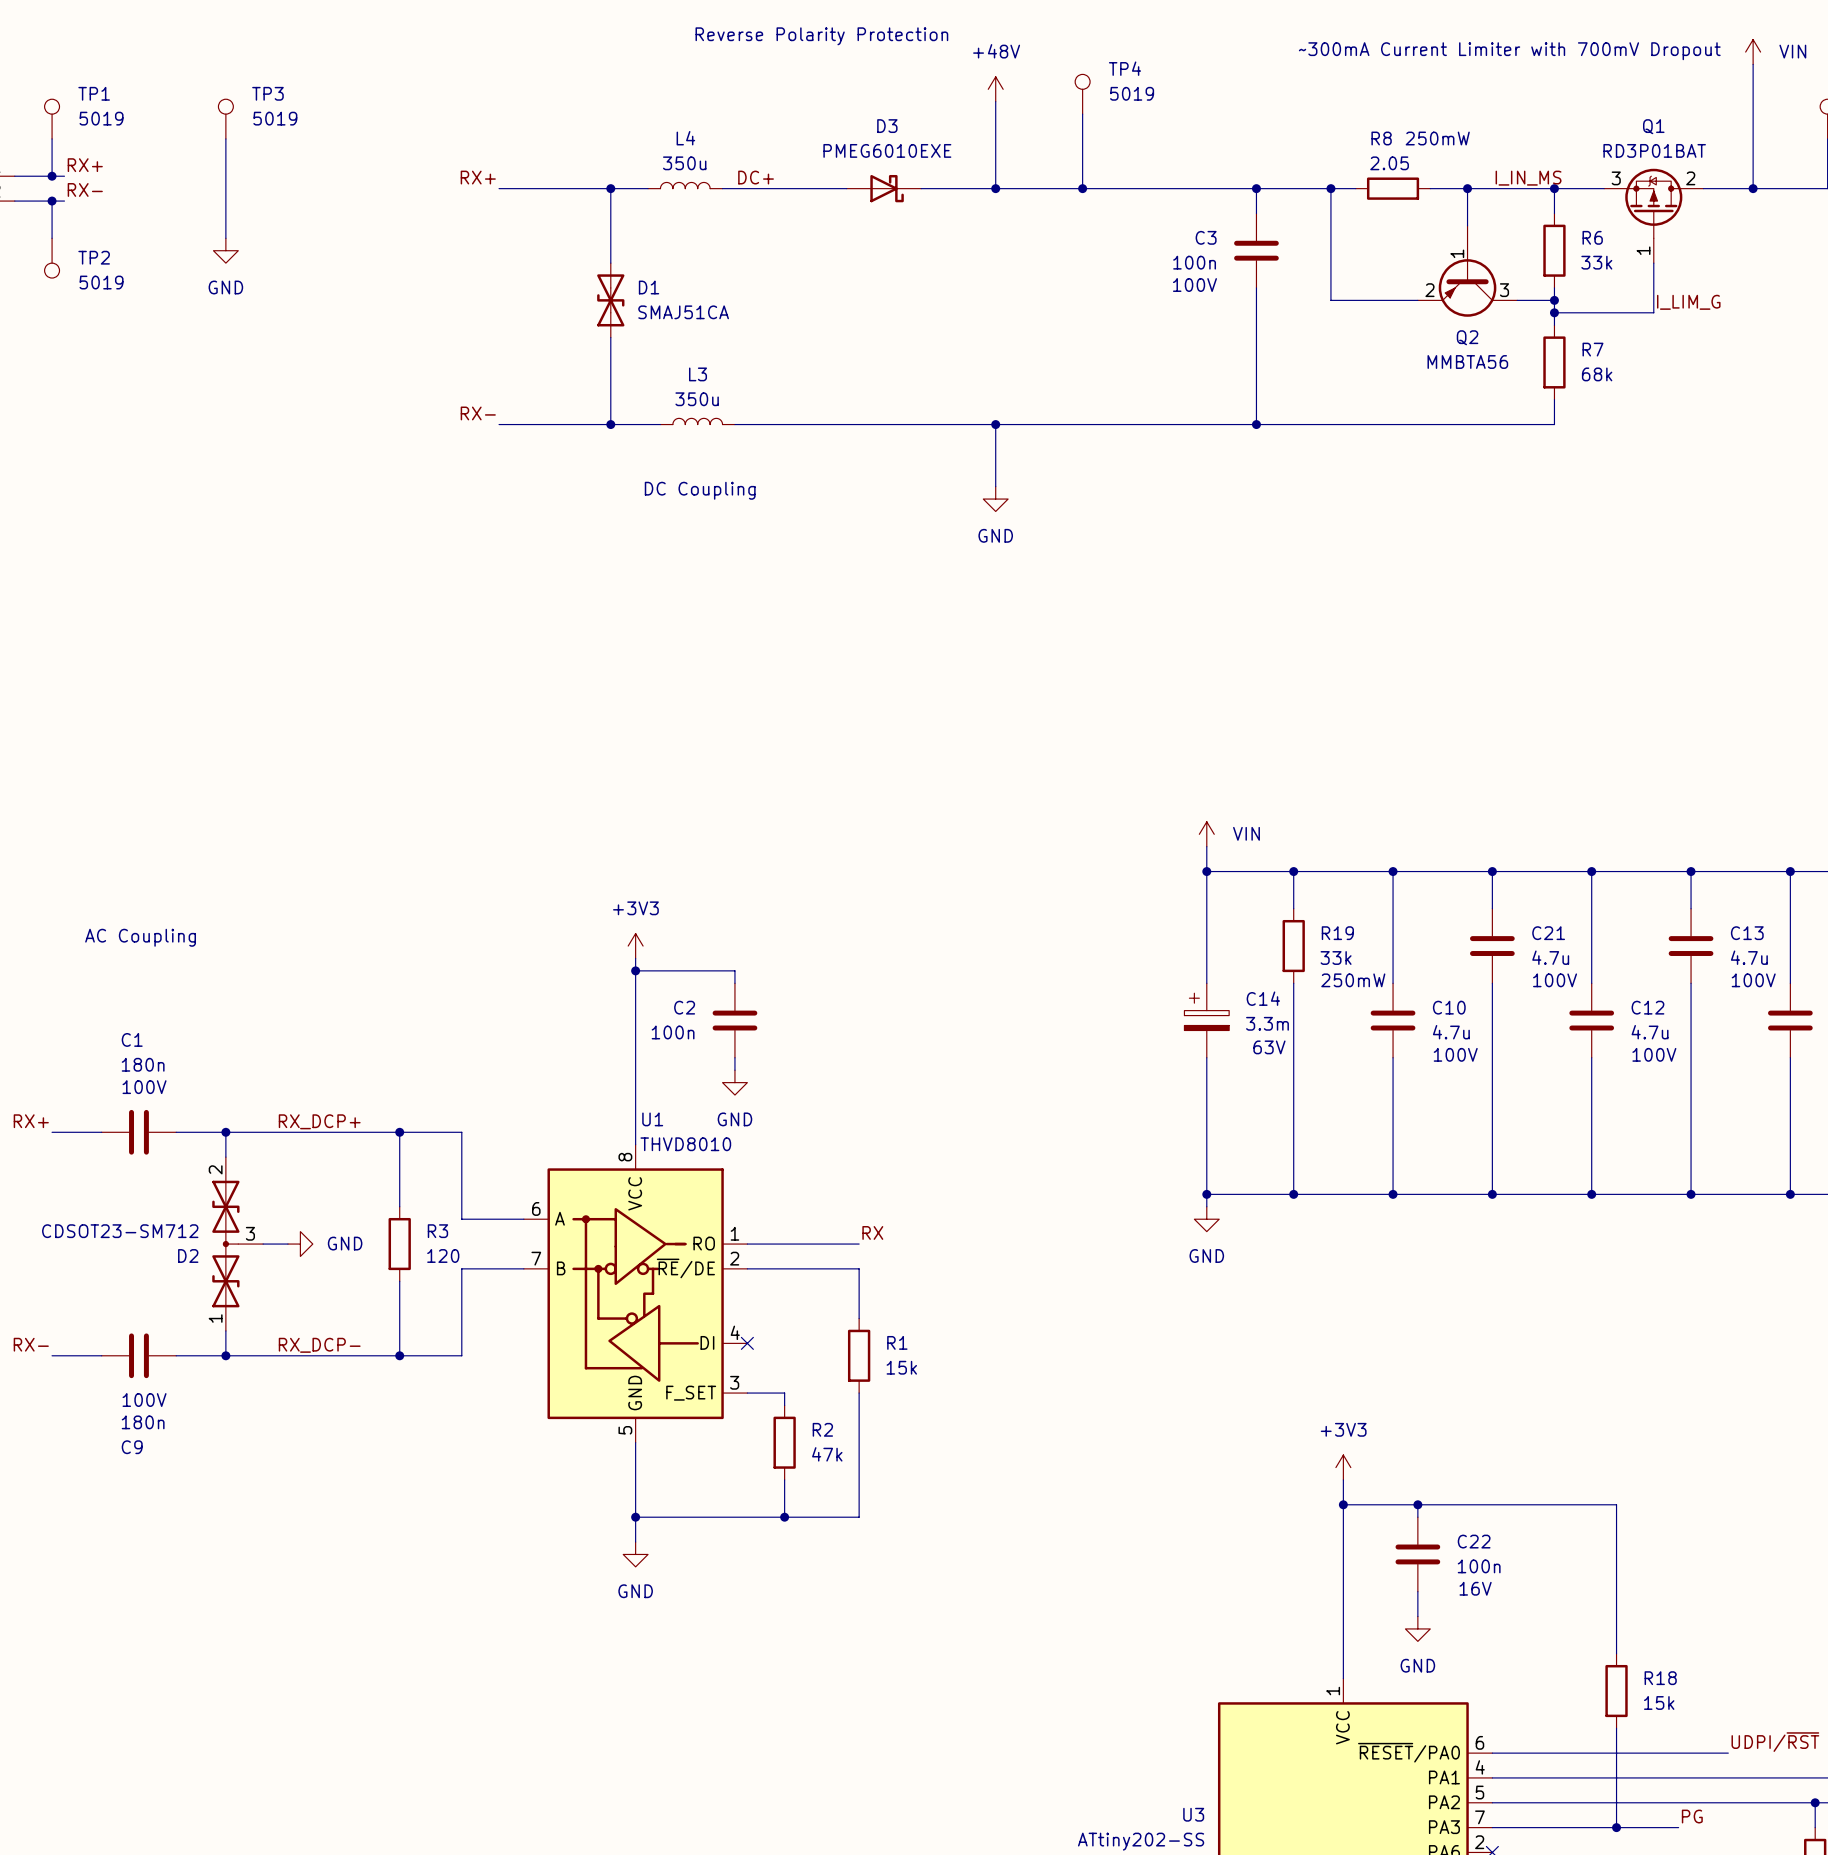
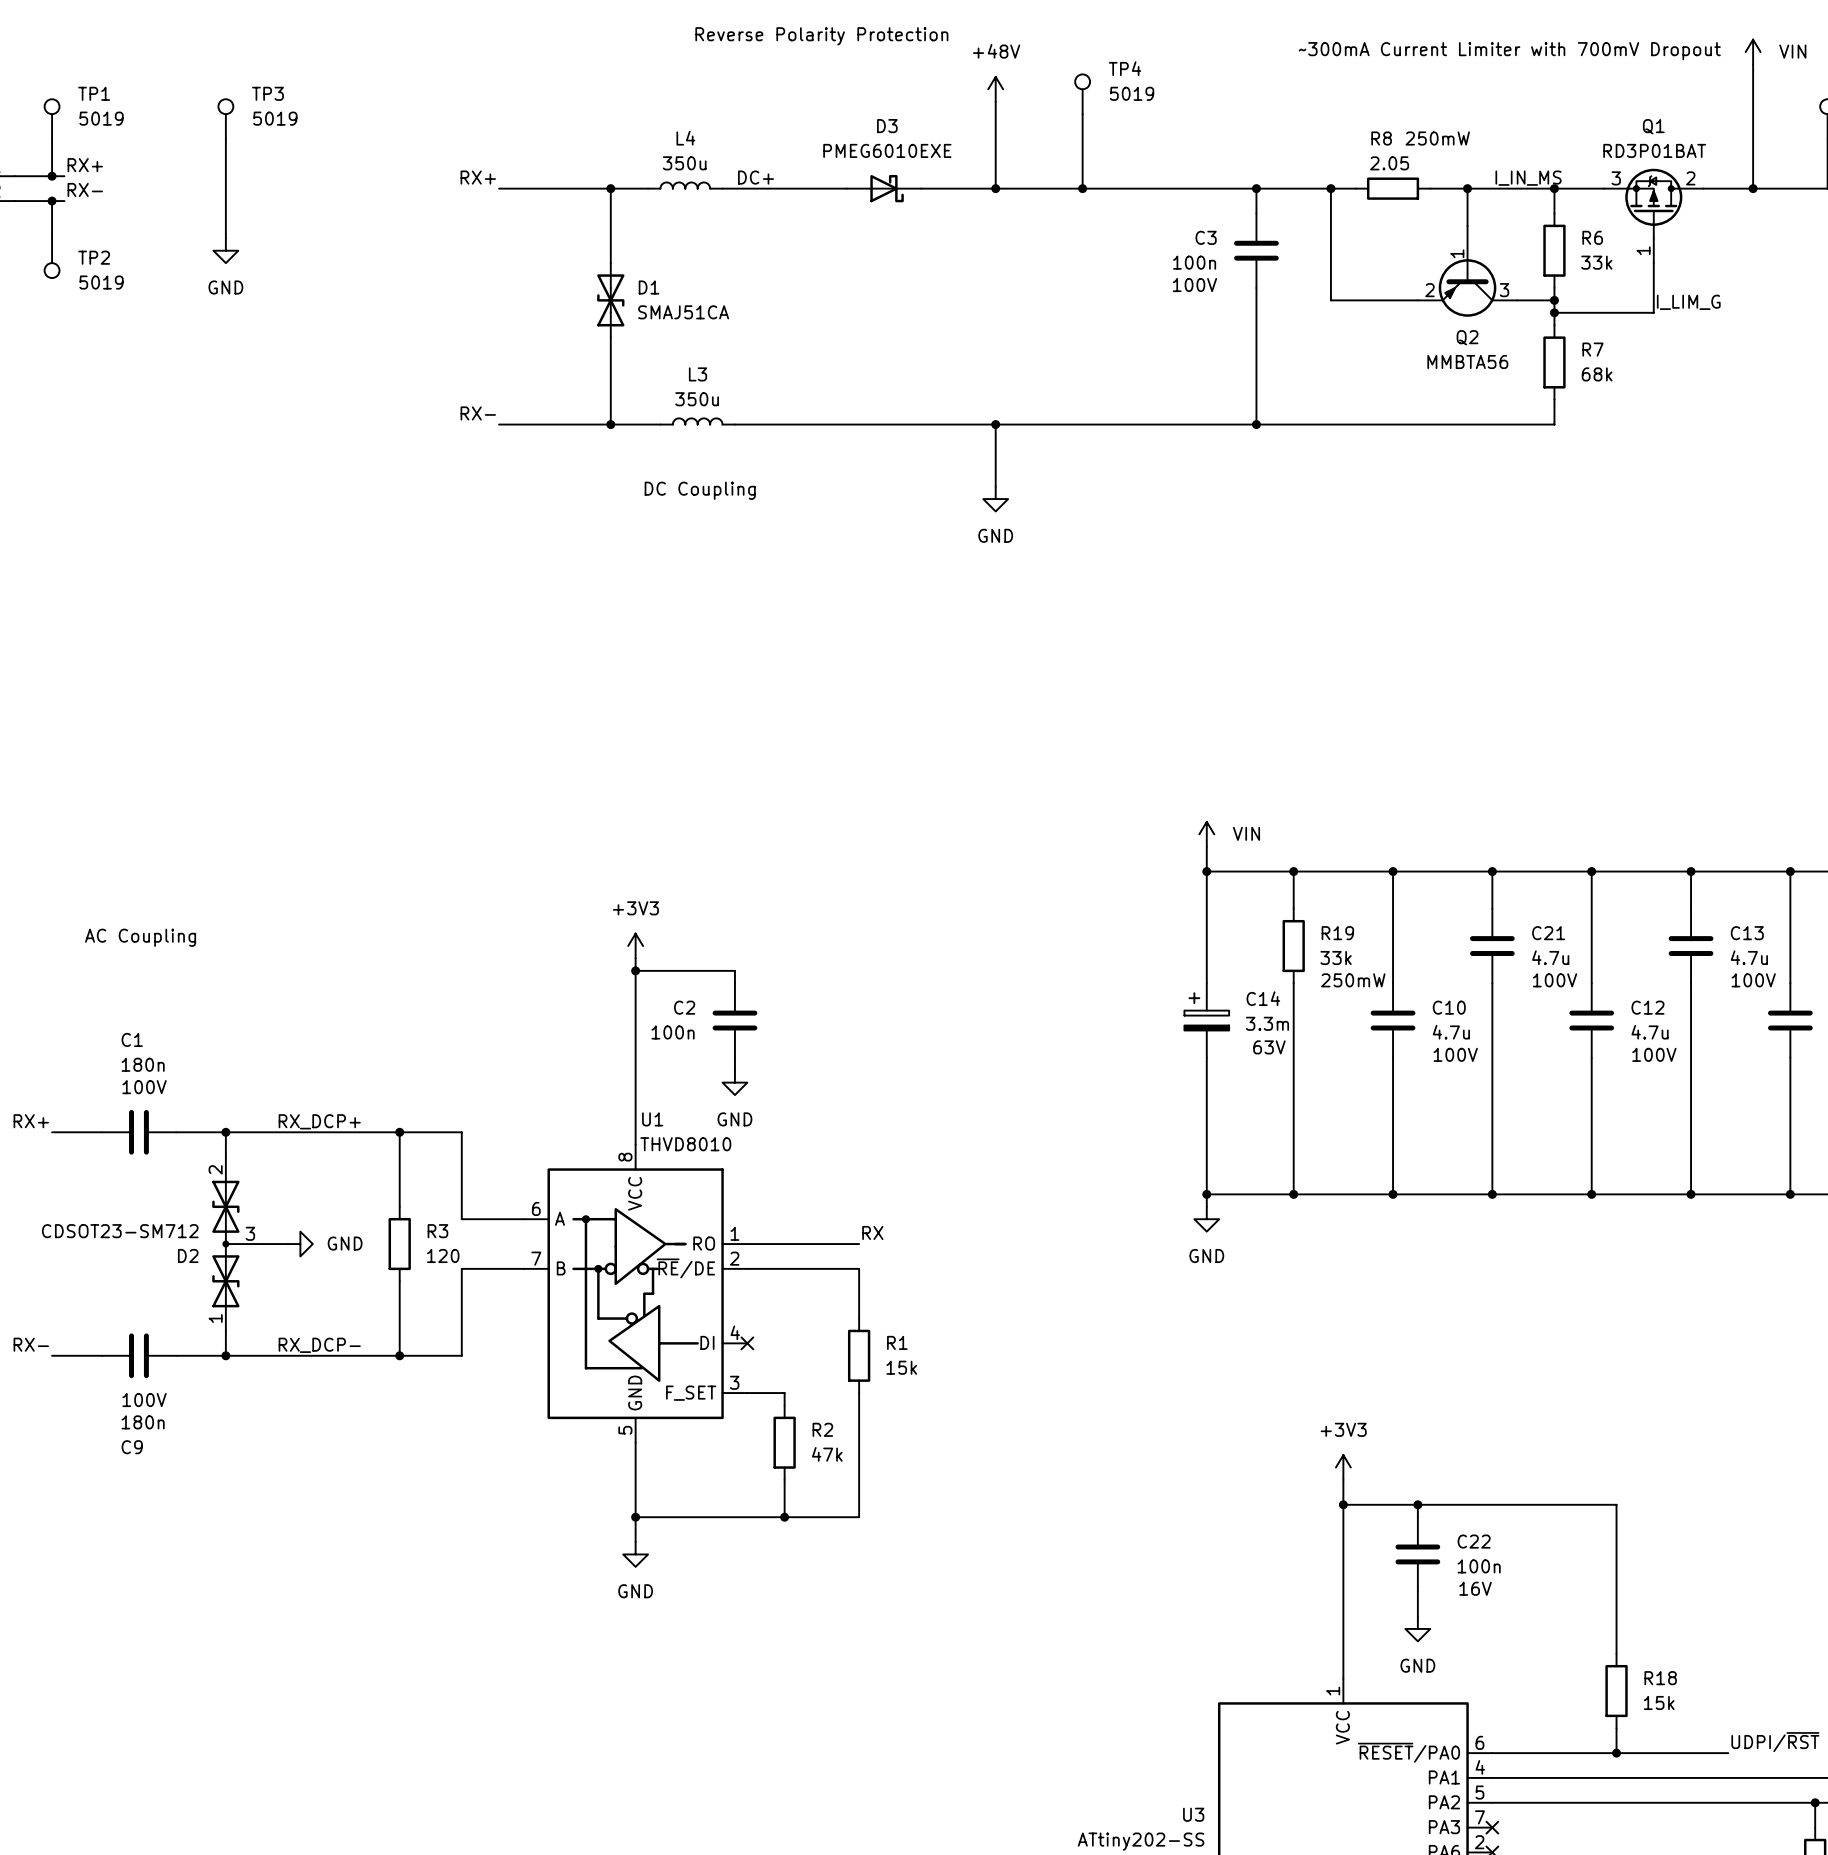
wire: (1616, 1753) (1616, 1827) -> none
junction: none -> (1616, 1753)
label: PG (1692, 1816) -> none
wire: (1492, 1827) (1678, 1827) -> none
no-connect mark: none -> (1492, 1827)
junction: (1616, 1827) -> none

